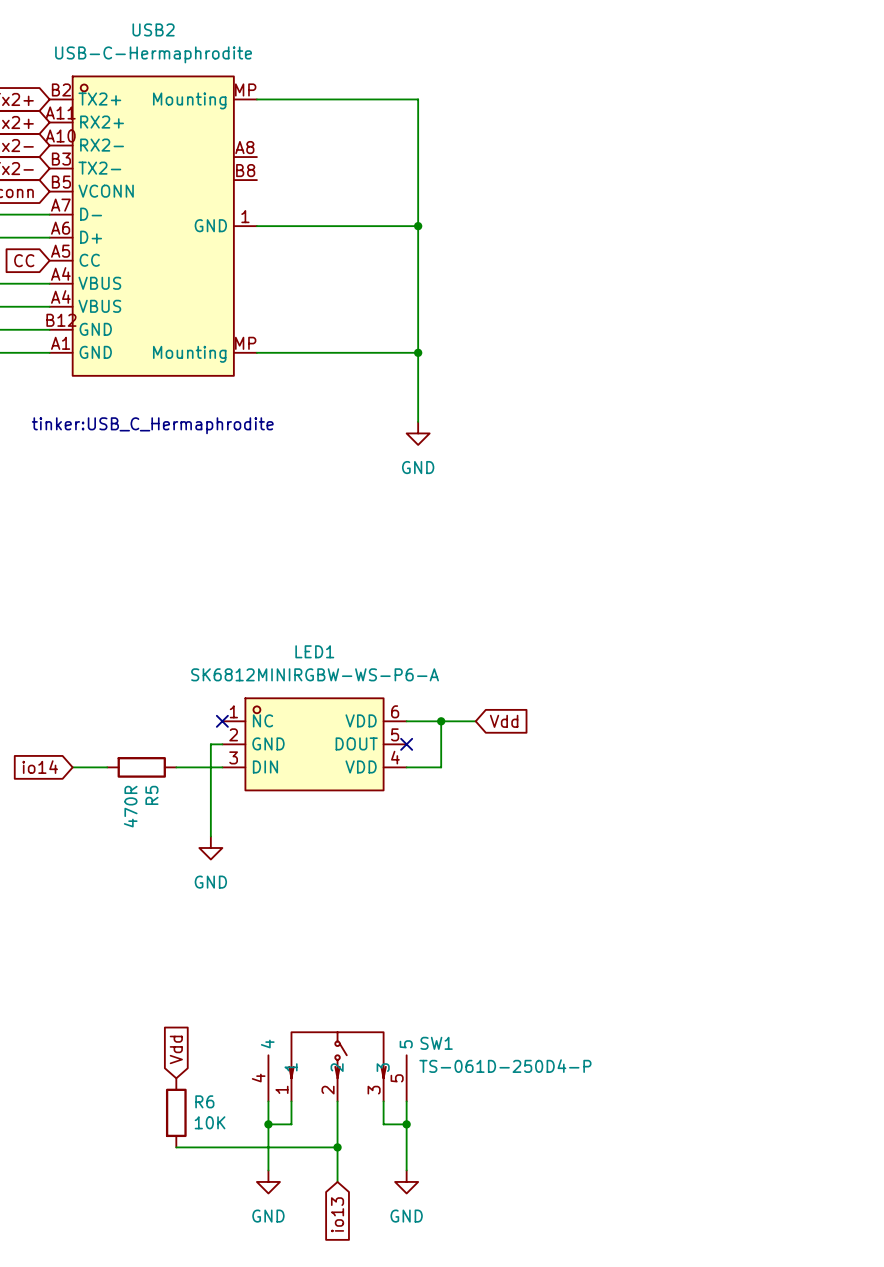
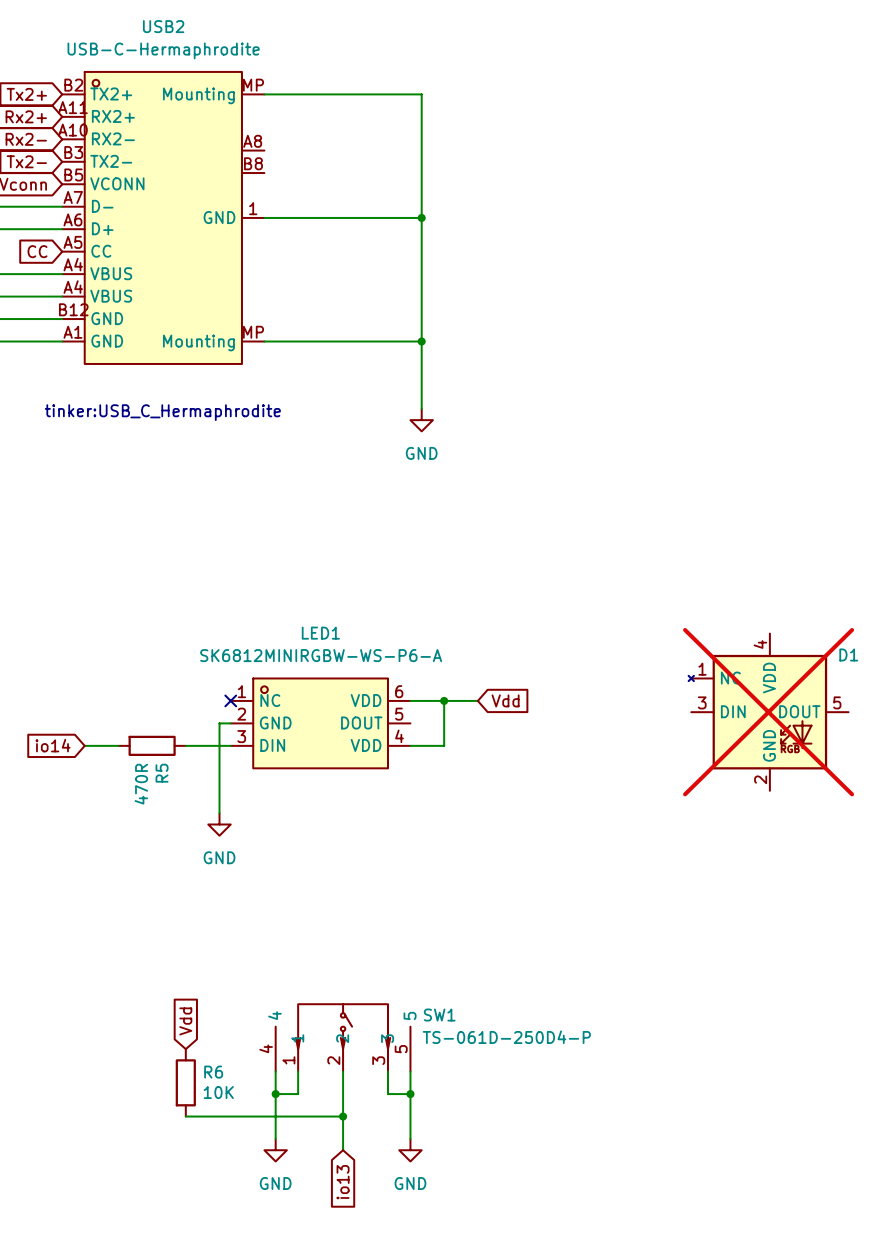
D1: none -> (768, 712)
no-connect mark: (406, 744) -> none

